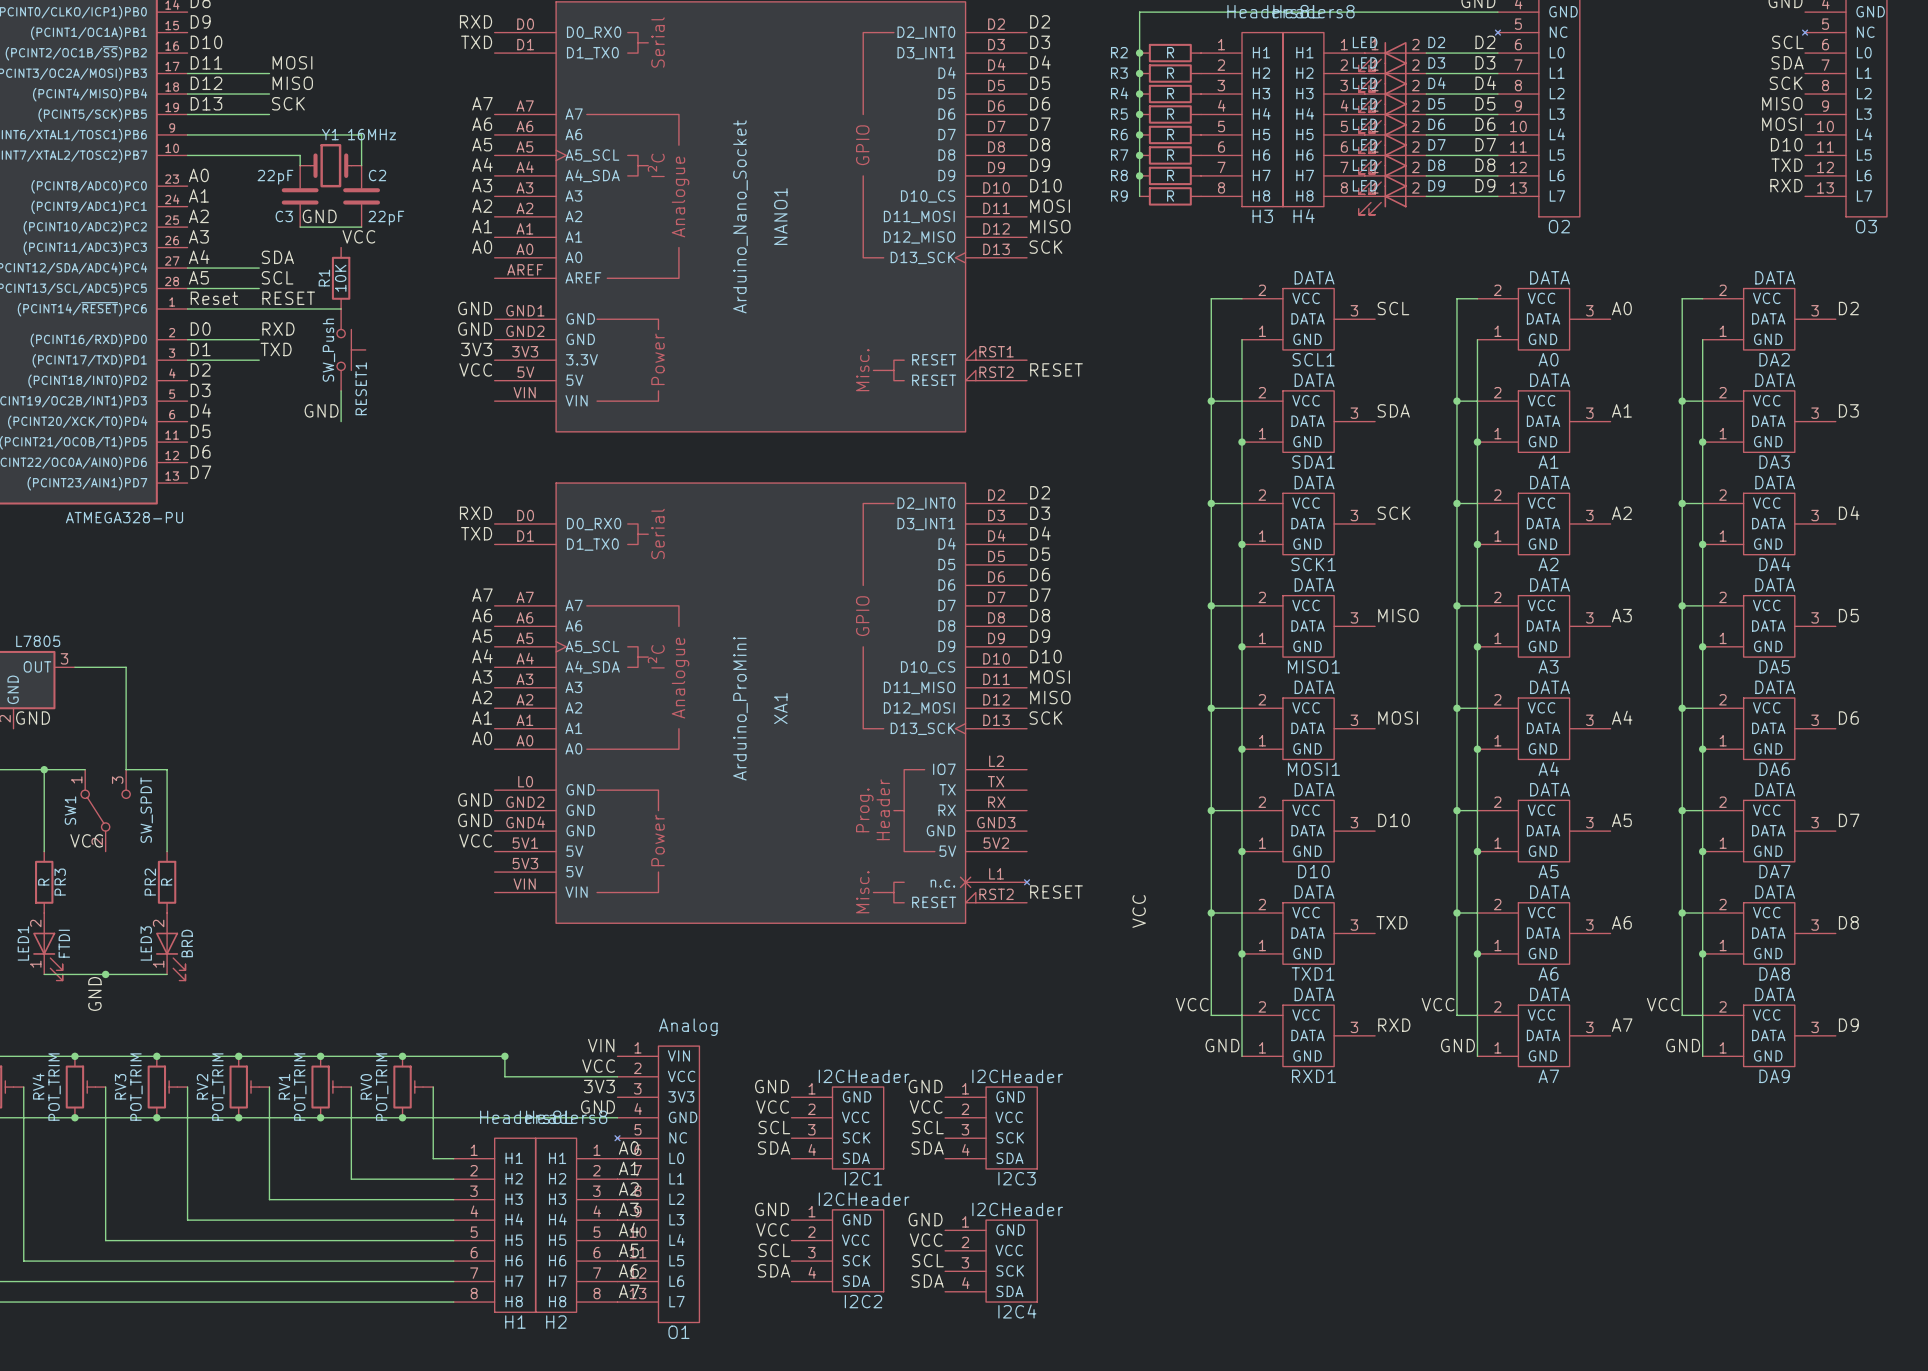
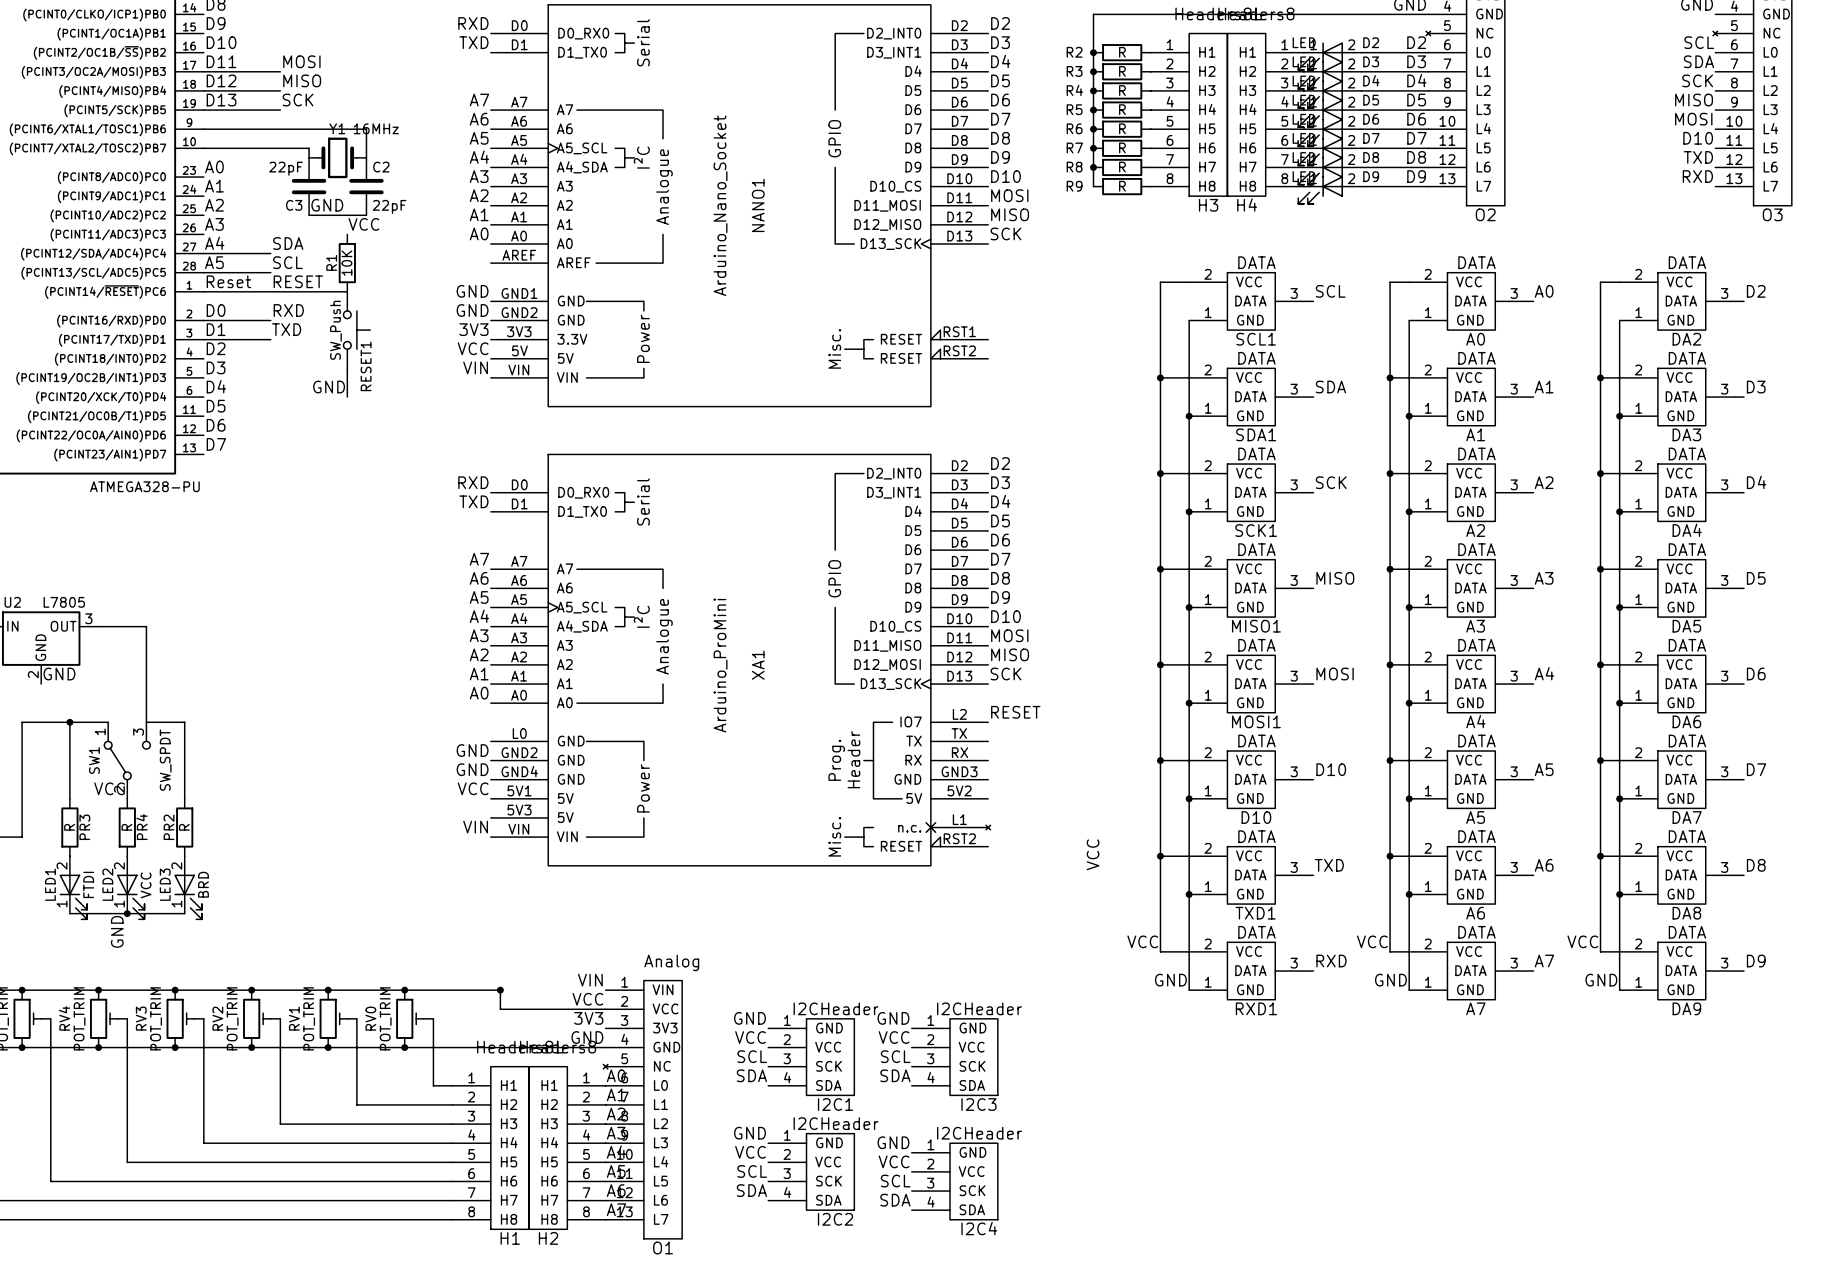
label: RESET (1056, 369) -> none
label: none -> VIN (475, 367)
label: none -> VIN (475, 827)
PR4: none -> R (127, 827)
label position: RESET (1056, 892) -> RESET (1015, 712)
LED2: none -> VCC (130, 887)

